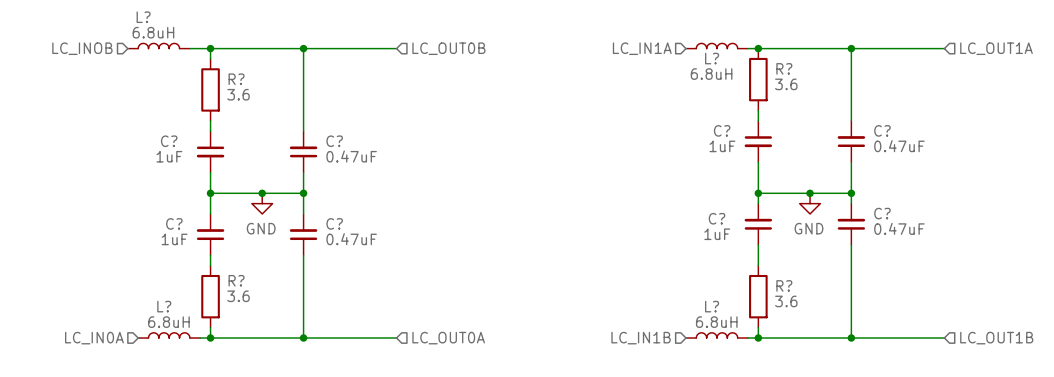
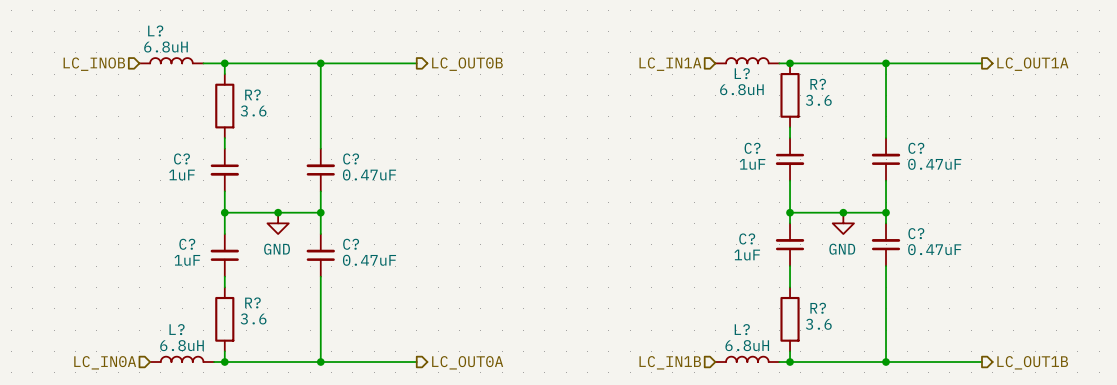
hierarchical label shape: input (448, 48) -> output (467, 64)
hierarchical label shape: input (996, 48) -> output (1032, 64)
hierarchical label shape: input (448, 338) -> output (467, 362)
hierarchical label shape: input (996, 338) -> output (1032, 362)

